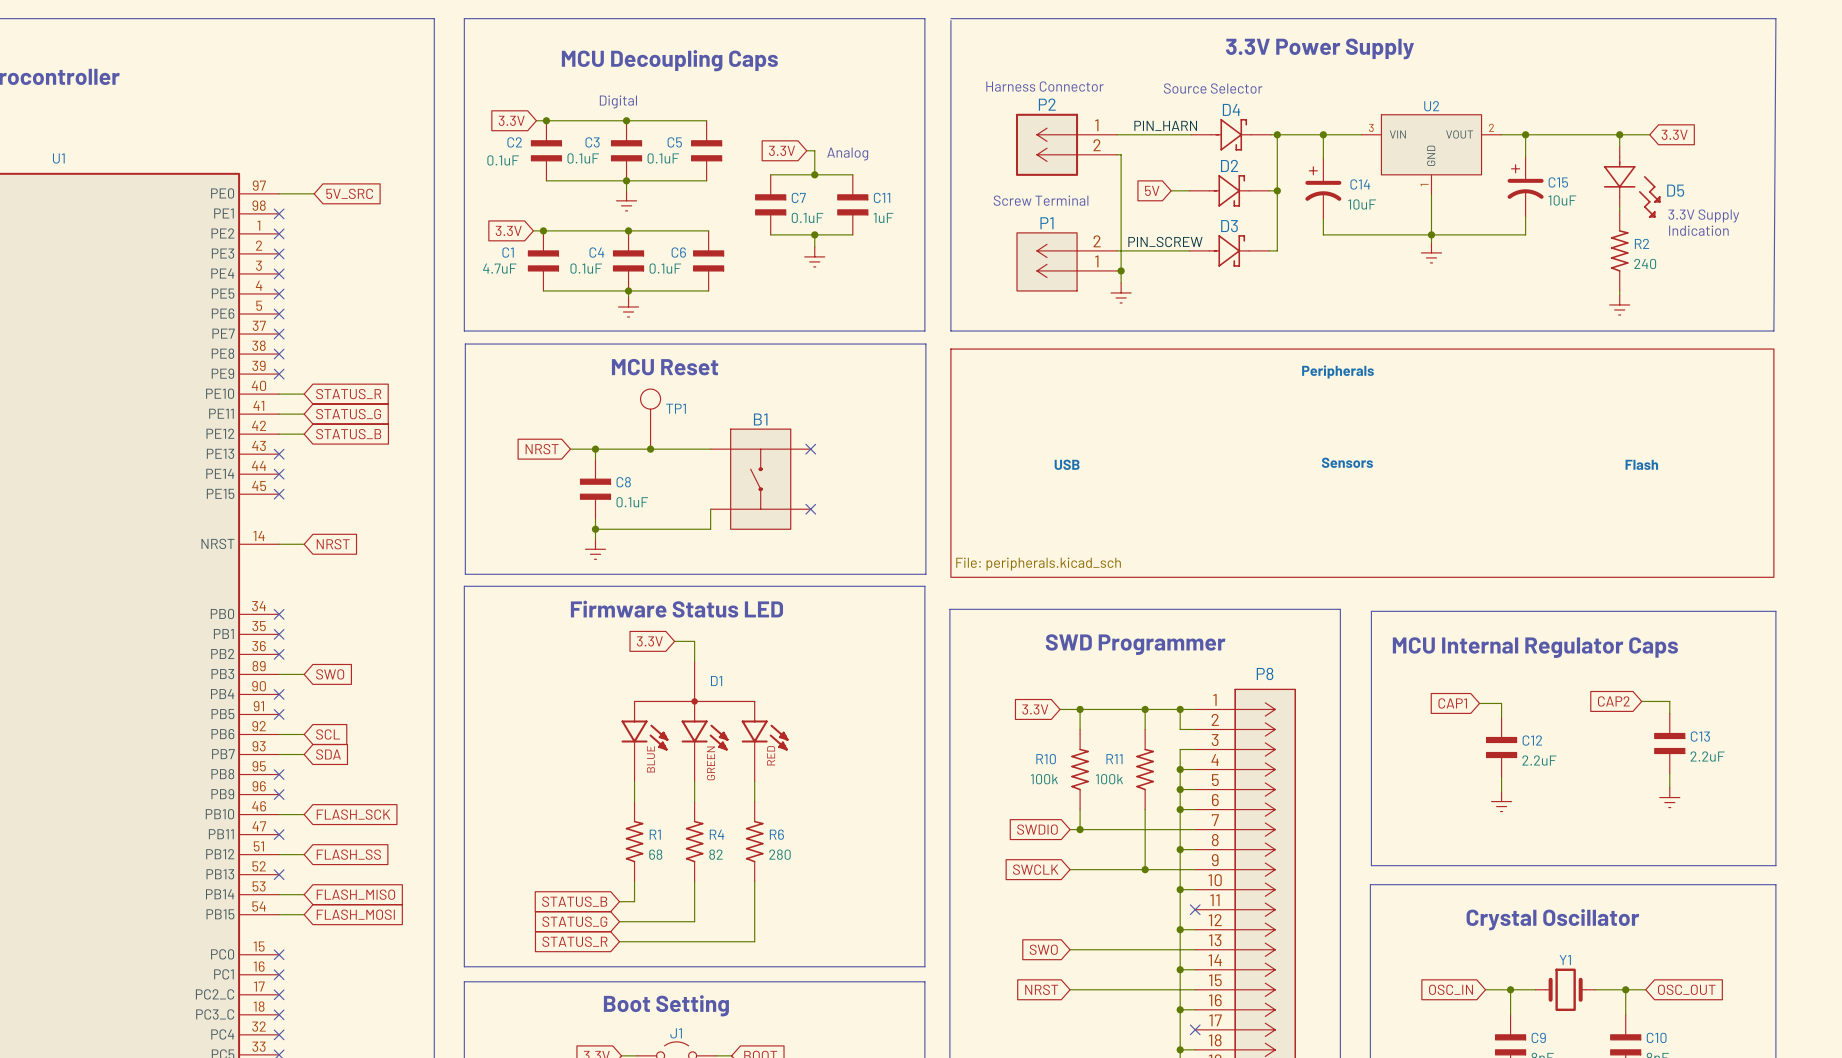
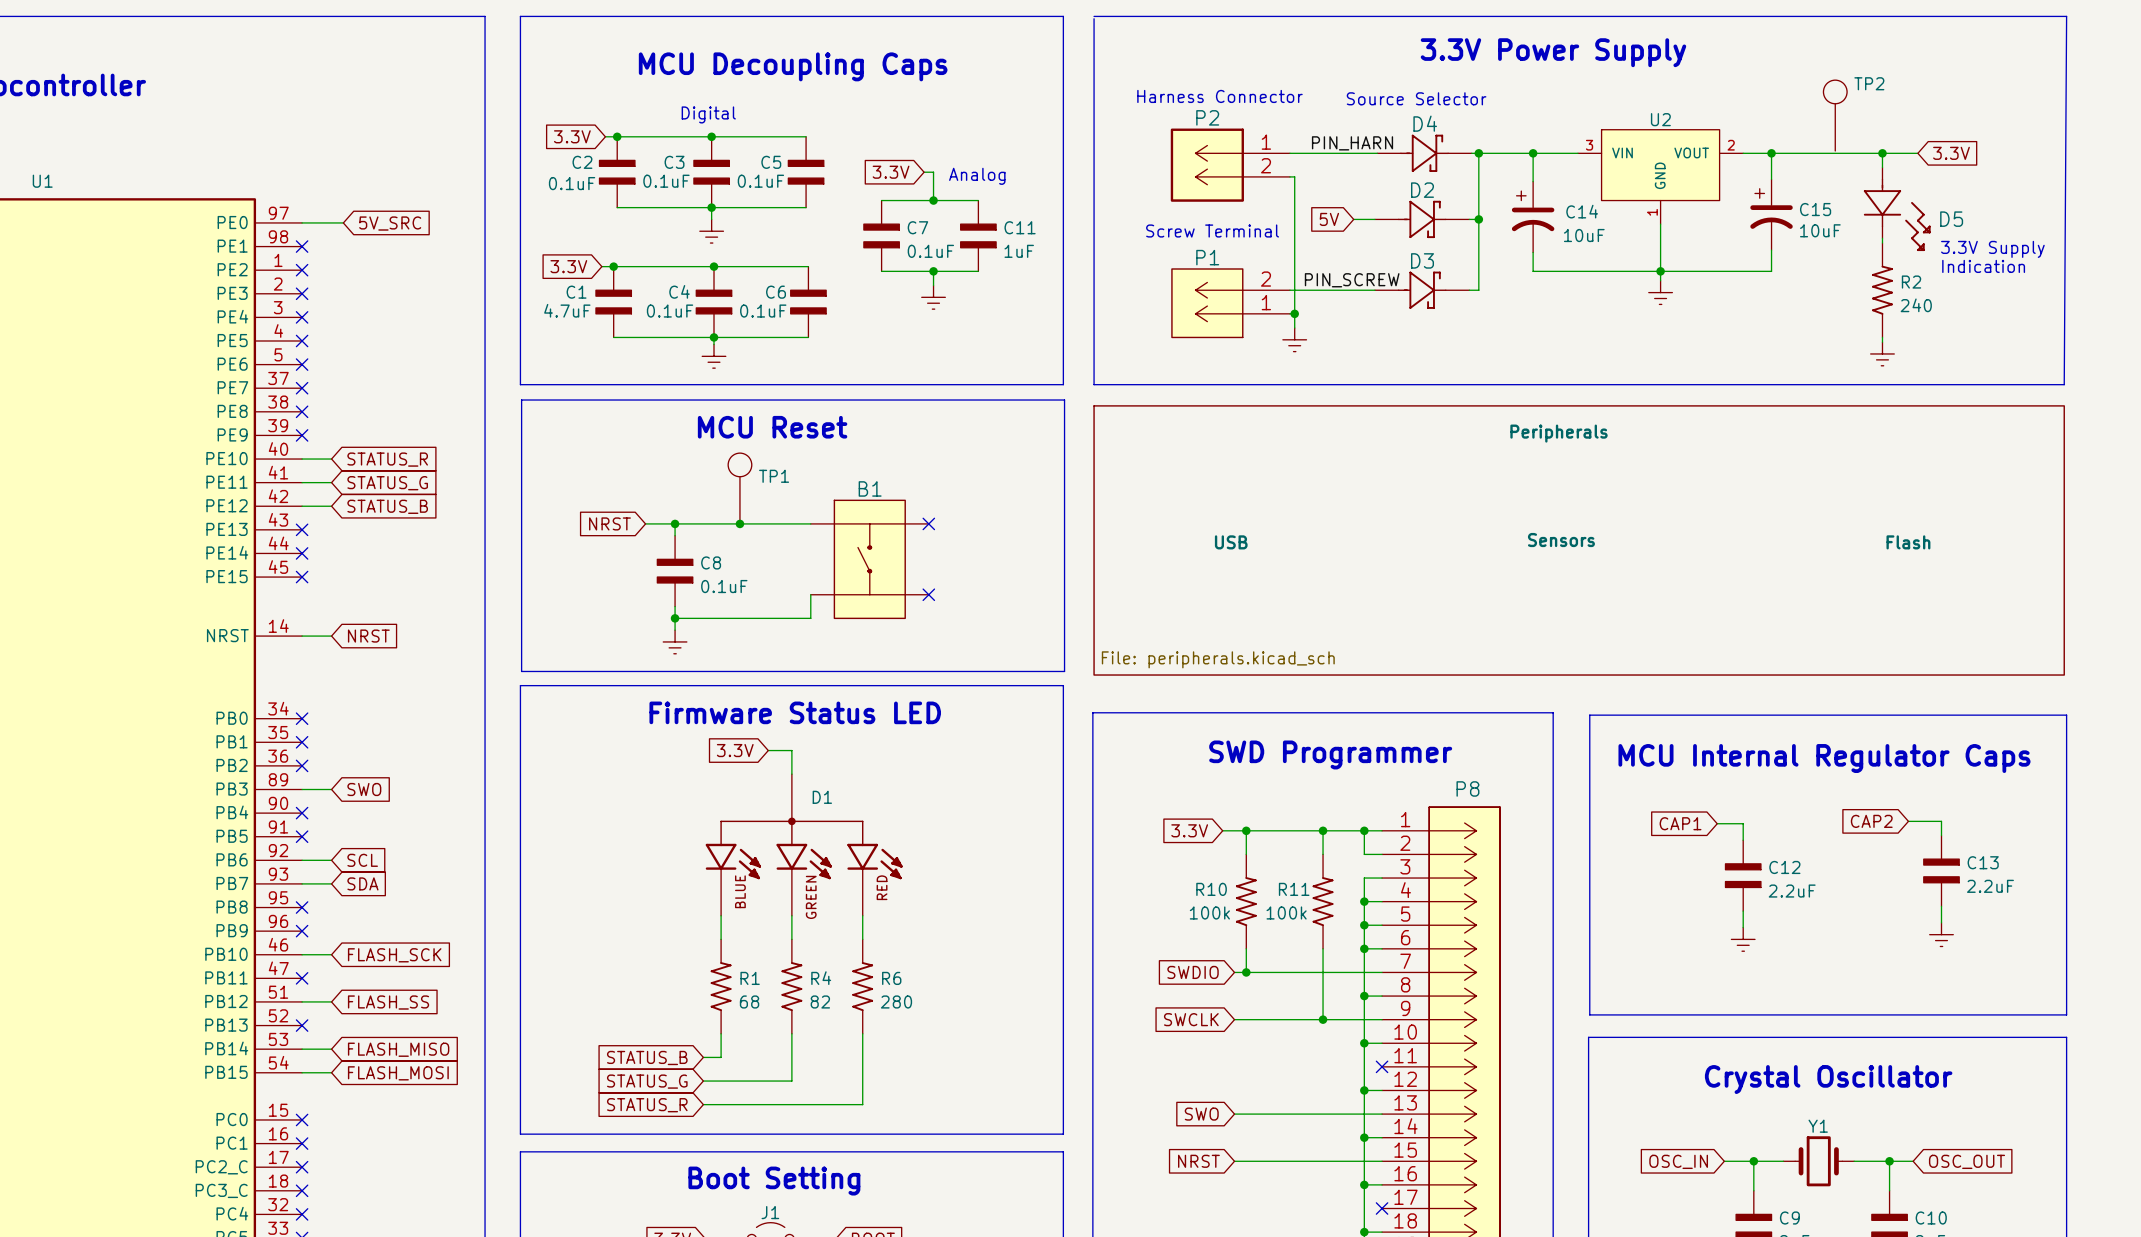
TP2: none -> (1835, 115)

